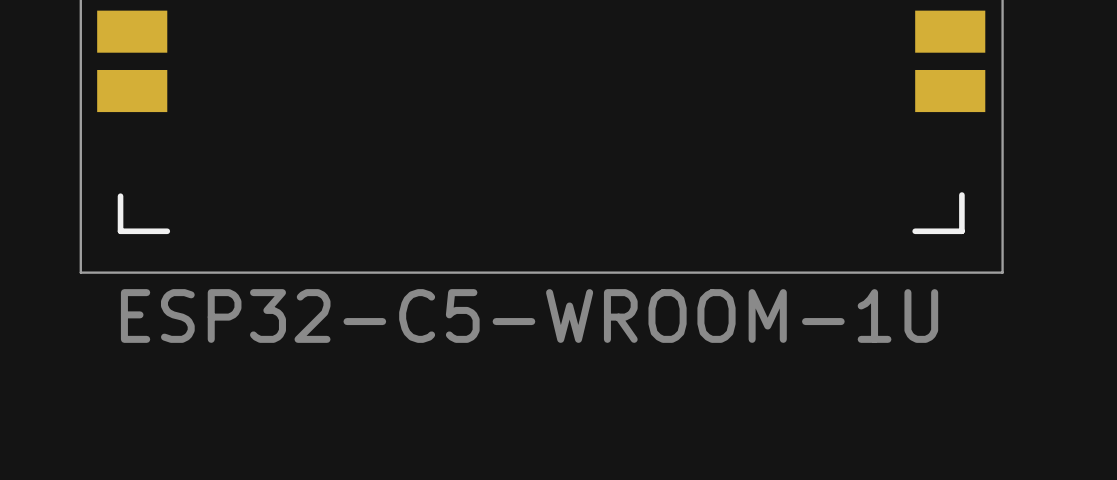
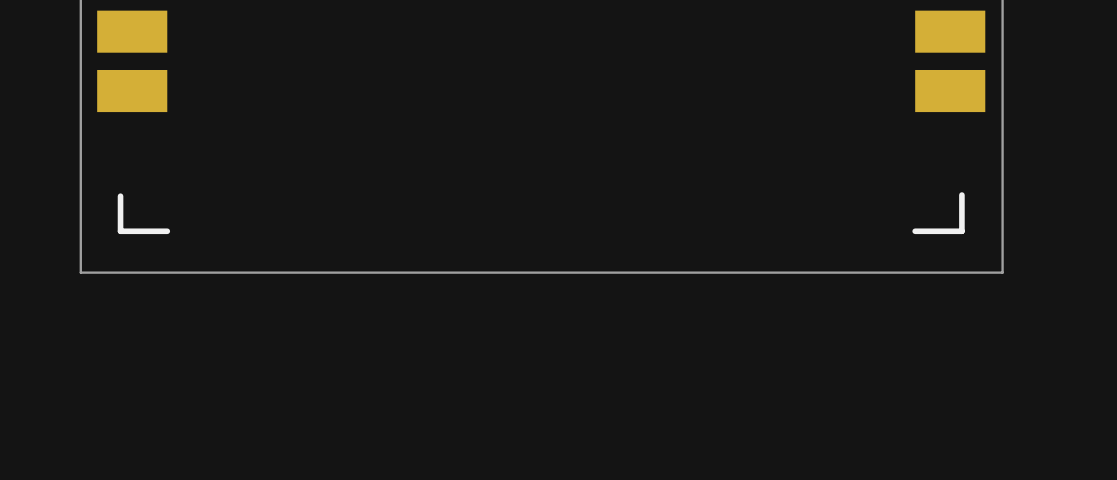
part value: ESP32-C5-WROOM-1U (529, 315) -> none

